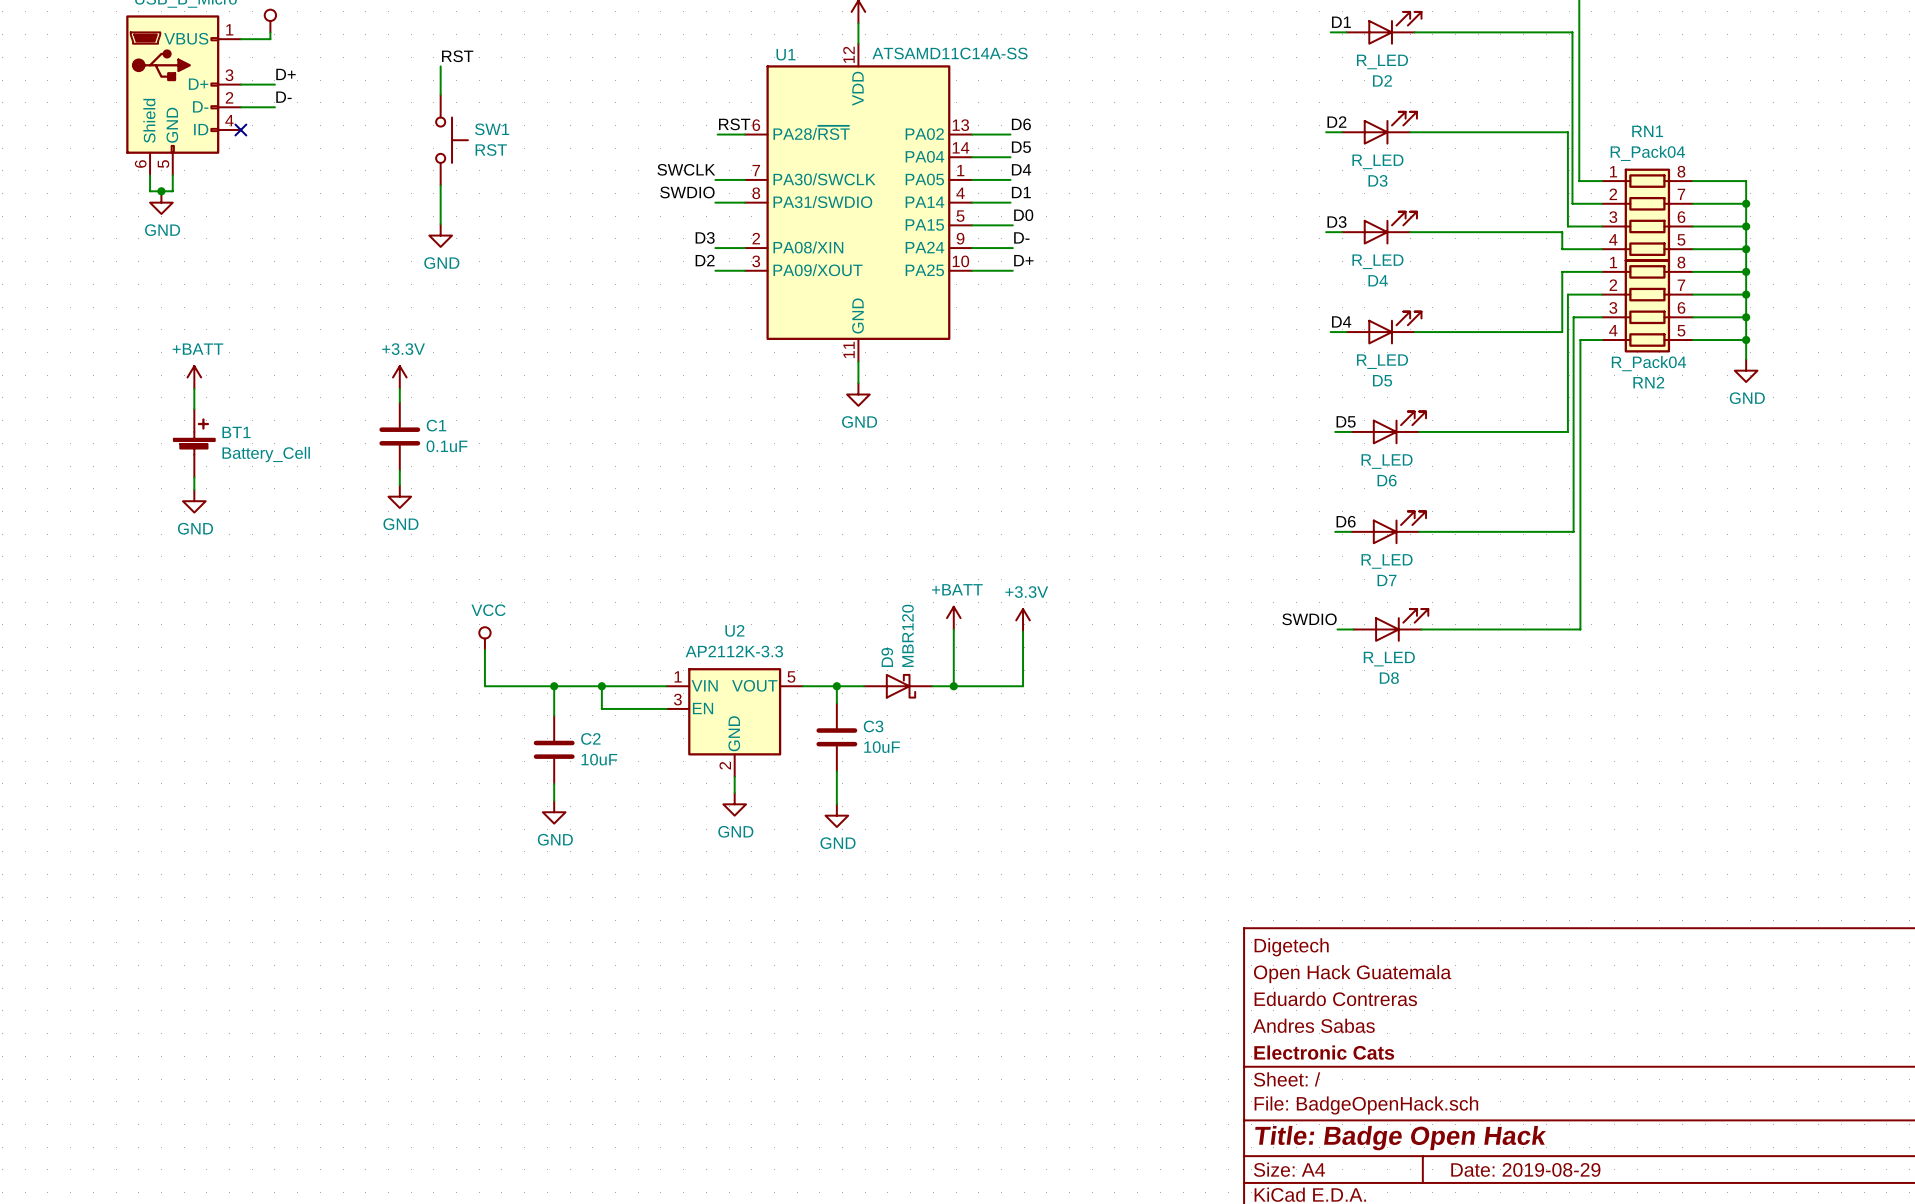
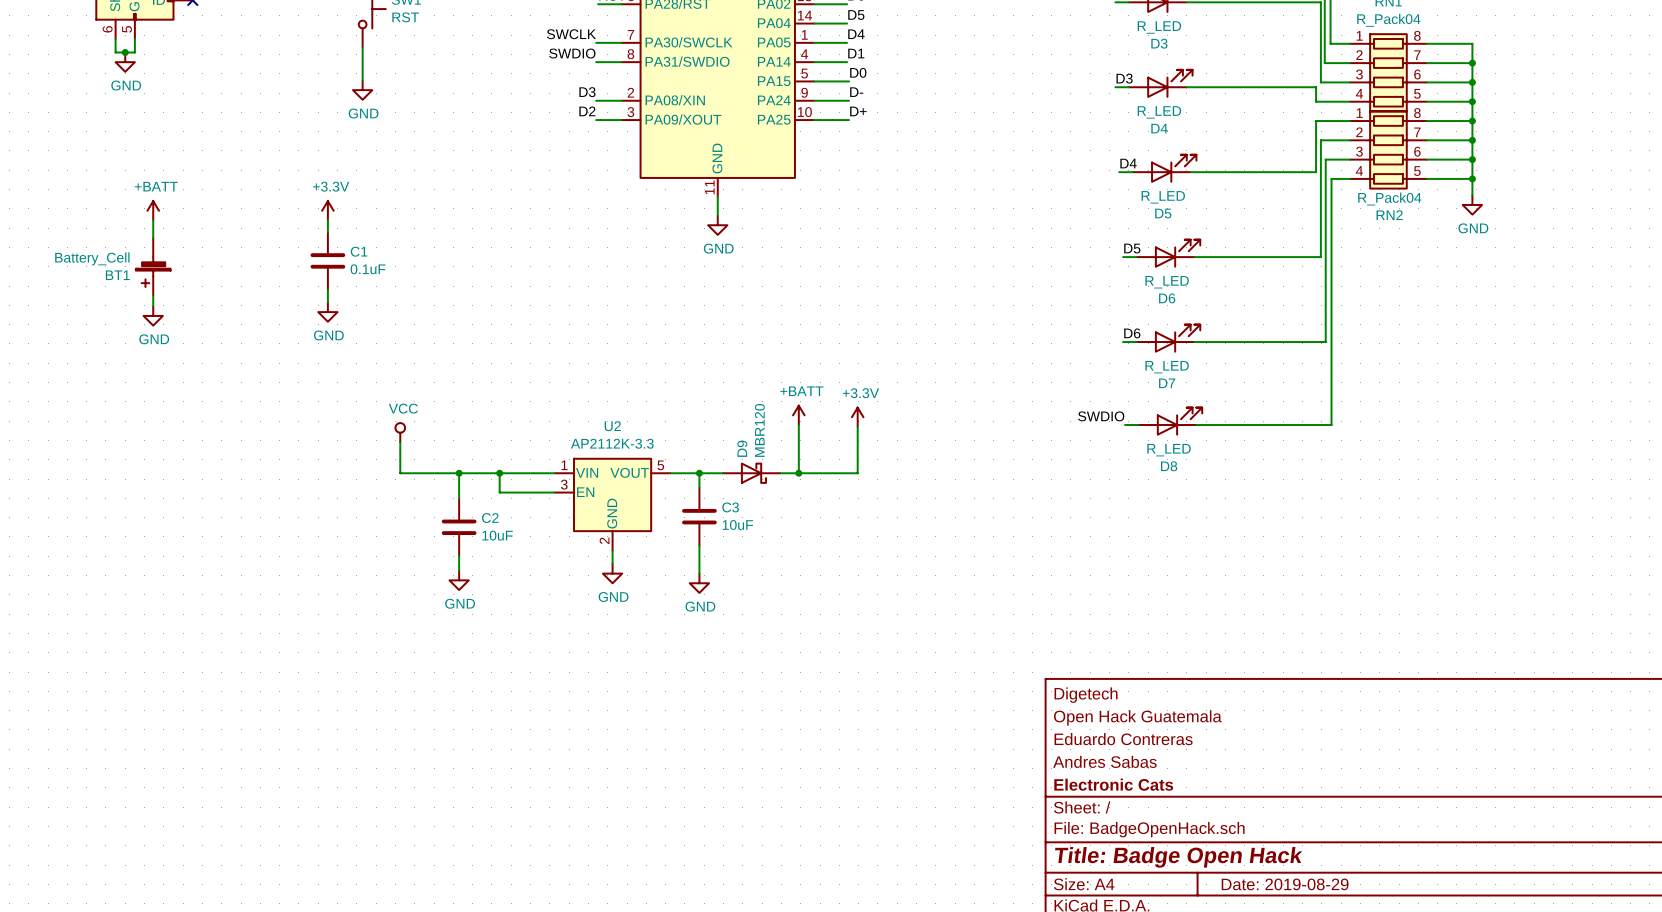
BT1 rotation: 0° (194, 436) -> 180° (153, 272)

